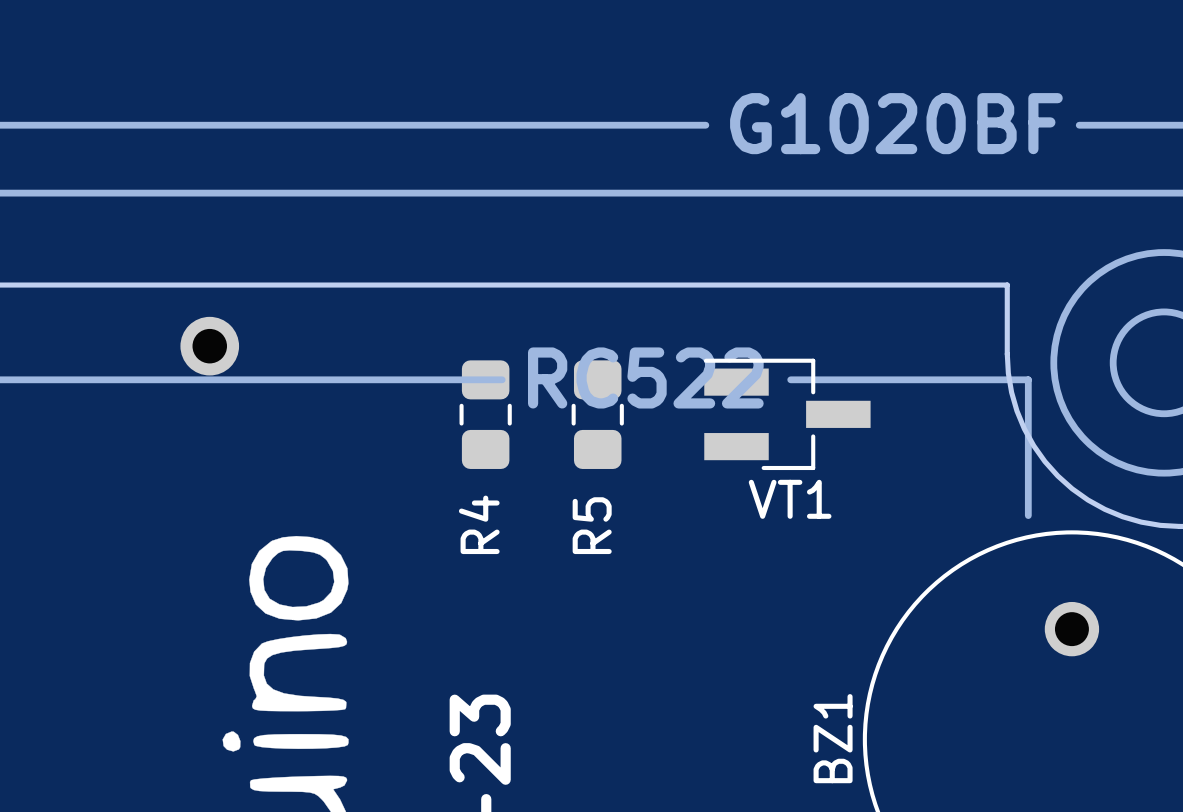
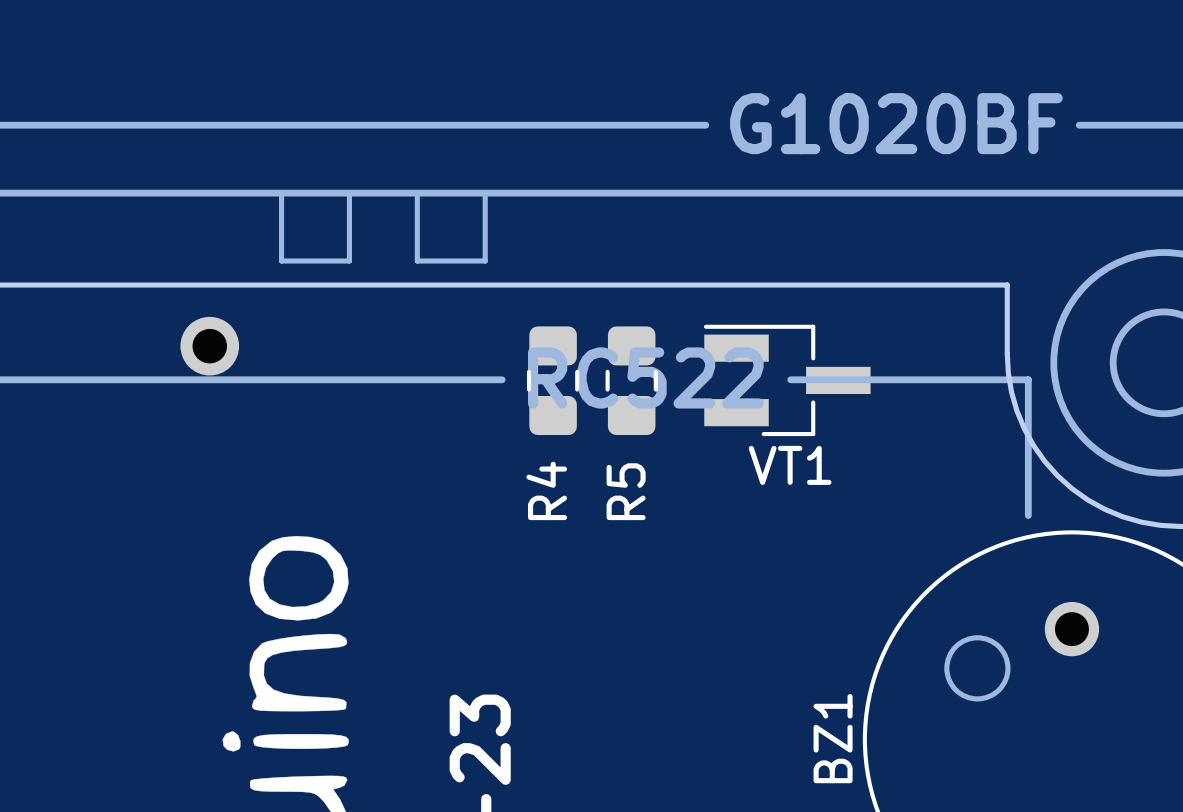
line: none -> (281, 193) (281, 261) (349, 261) (349, 193)
line: none -> (417, 193) (417, 261) (485, 261) (485, 193)
R4 position: (485, 414) -> (553, 380)
R5 position: (597, 414) -> (631, 380)
VT1 position: (787, 414) -> (787, 380)
drawing: none -> [944, 635, 1011, 702]

